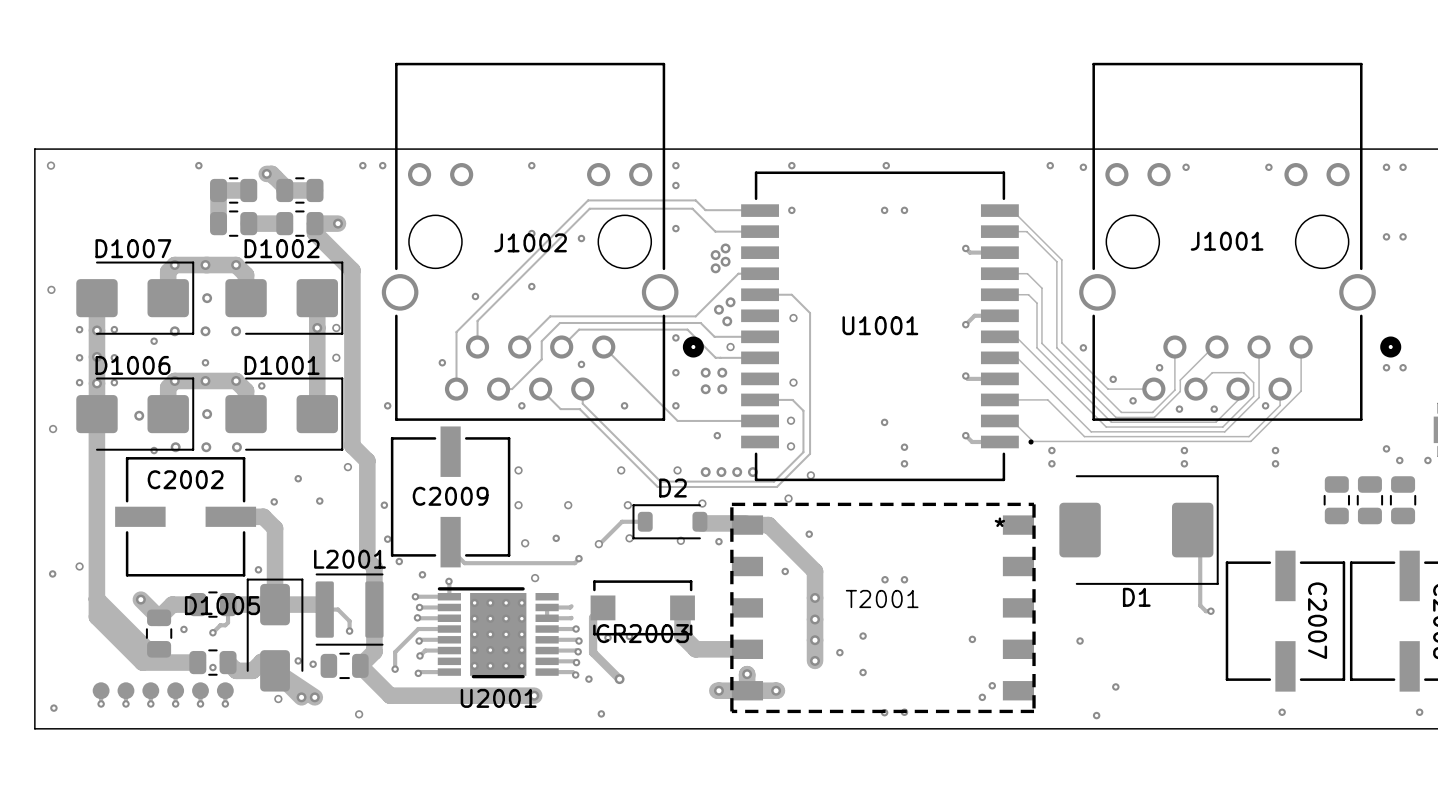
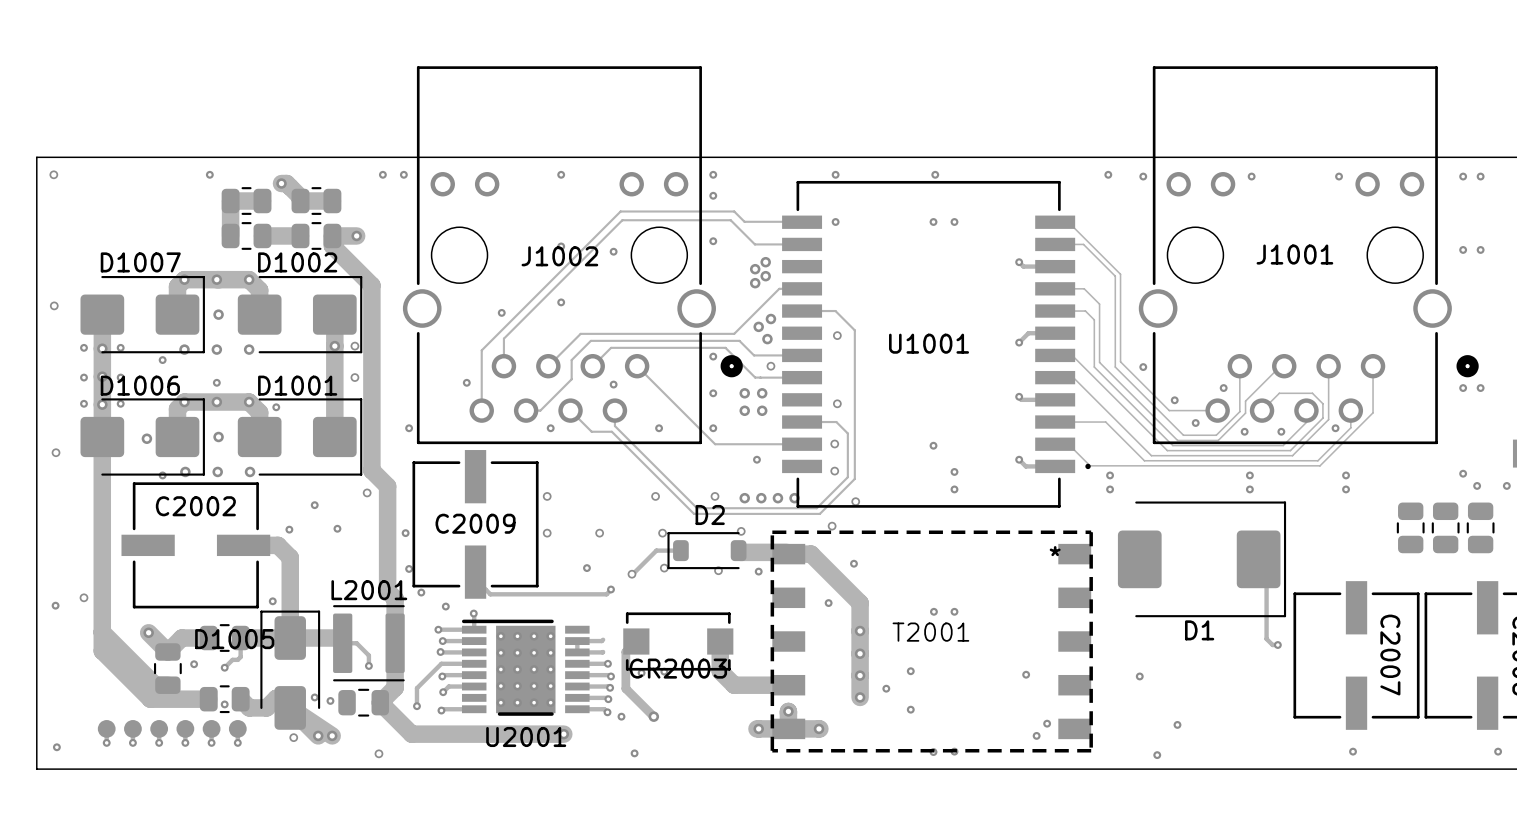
via: (525, 543) -> none
via: (535, 578) -> none

